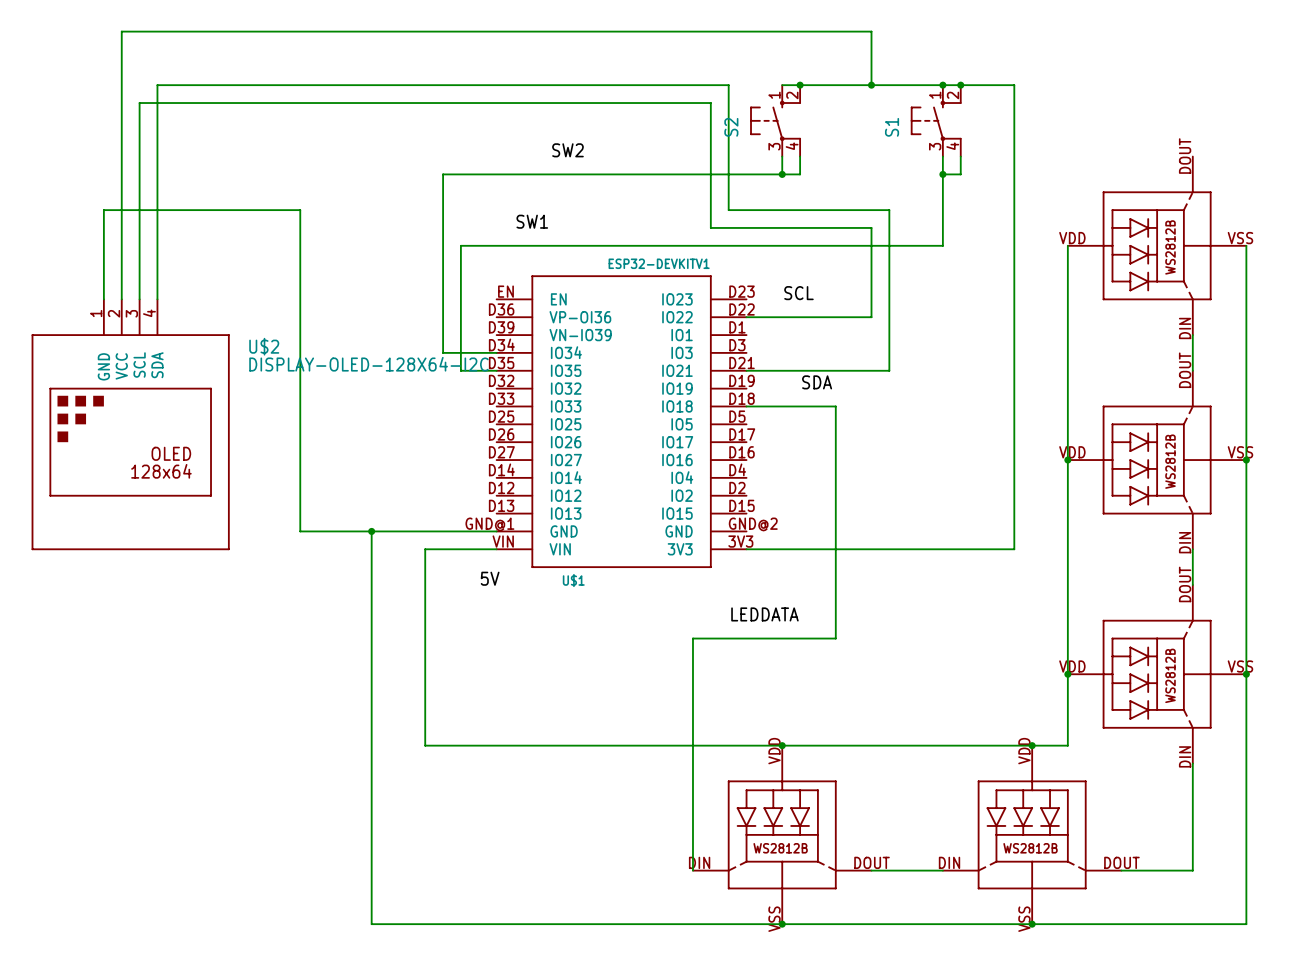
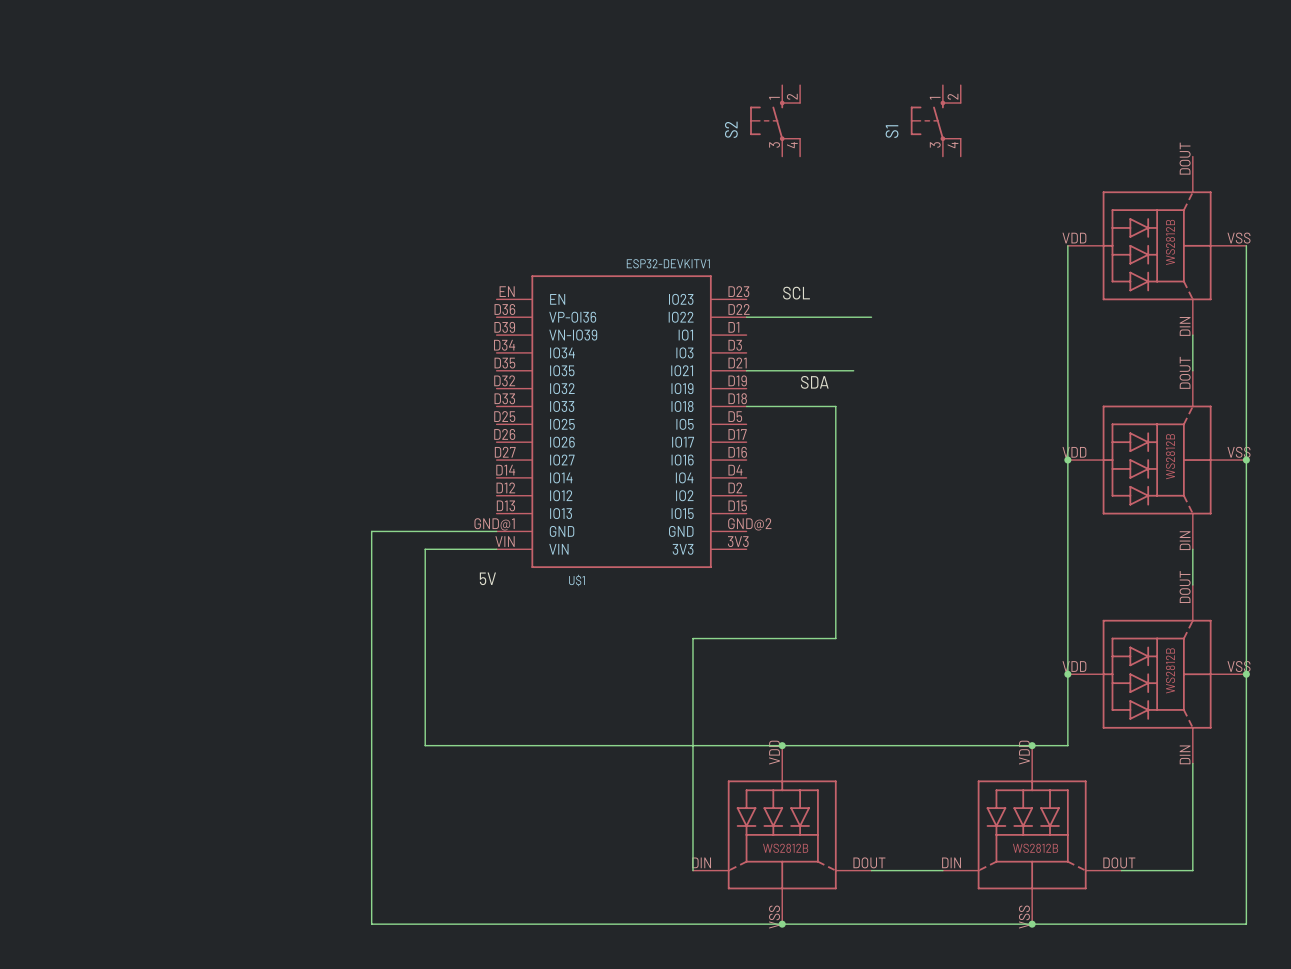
wire: (782, 85) (1014, 85) (1014, 549) (746, 549) -> none
junction: (800, 85) -> none
wire: (871, 85) (871, 31) (121, 31) (121, 299) -> none
junction: (871, 85) -> none
junction: (942, 85) -> none
junction: (960, 85) -> none
label: SW2 (567, 150) -> none
wire: (782, 156) (782, 174) -> none
wire: (800, 156) (800, 174) (443, 174) (443, 352) (496, 352) -> none
wire: (942, 156) (942, 245) (460, 245) (460, 370) (496, 370) -> none
wire: (960, 156) (960, 174) (942, 174) -> none
junction: (782, 174) -> none
junction: (942, 174) -> none
label: SW1 (532, 221) -> none
wire: (103, 299) (103, 210) (300, 210) (300, 531) (371, 531) -> none
wire: (139, 299) (139, 103) (710, 103) (710, 227) (871, 227) (871, 317) -> none
wire: (157, 299) (157, 85) (728, 85) (728, 210) (889, 210) (889, 370) (853, 370) -> none
U$2: DISPLAY-OLED-128X64-I2C (130, 424) -> none
junction: (371, 531) -> none
label: LEDDATA (764, 614) -> none

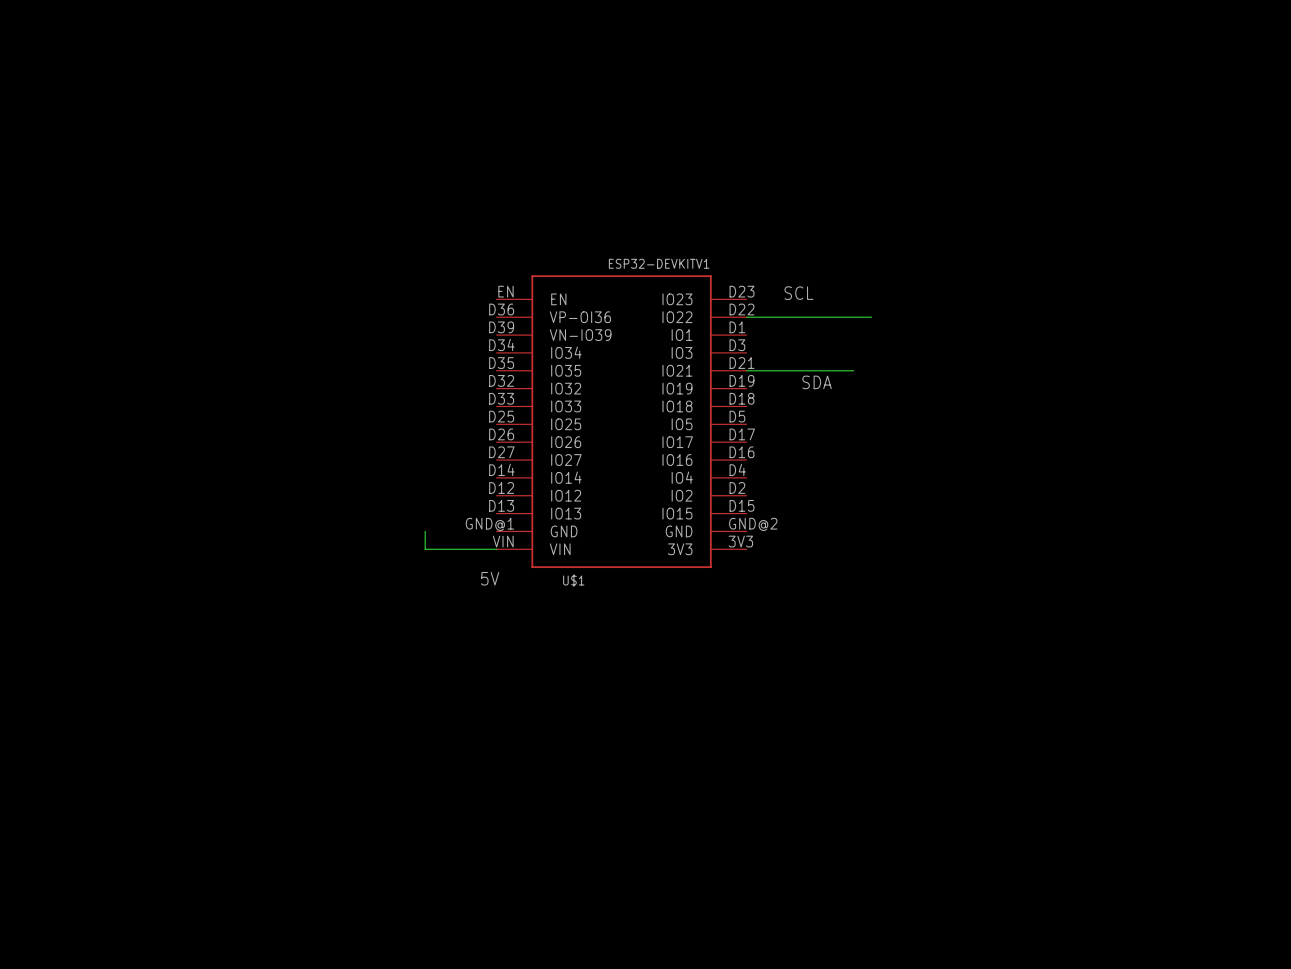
S2: (775, 120) -> none
S1: (936, 120) -> none
wire: (1067, 245) (1067, 745) (425, 745) (425, 549) -> (425, 531) (425, 549)
part: (1157, 245) -> none
wire: (1246, 245) (1246, 924) (371, 924) (371, 531) (496, 531) -> none
wire: (1192, 335) (1192, 370) -> none
wire: (746, 406) (835, 406) (835, 638) (692, 638) (692, 870) -> none
junction: (1067, 460) -> none
part: (1157, 460) -> none
junction: (1246, 460) -> none
wire: (1192, 549) (1192, 584) -> none
junction: (1067, 674) -> none
part: (1157, 674) -> none
junction: (1246, 674) -> none
junction: (782, 745) -> none
junction: (1032, 745) -> none
wire: (1192, 763) (1192, 870) (1121, 870) -> none
part: (782, 834) -> none
part: (1032, 834) -> none
wire: (871, 870) (942, 870) -> none
junction: (782, 924) -> none
junction: (1032, 924) -> none

